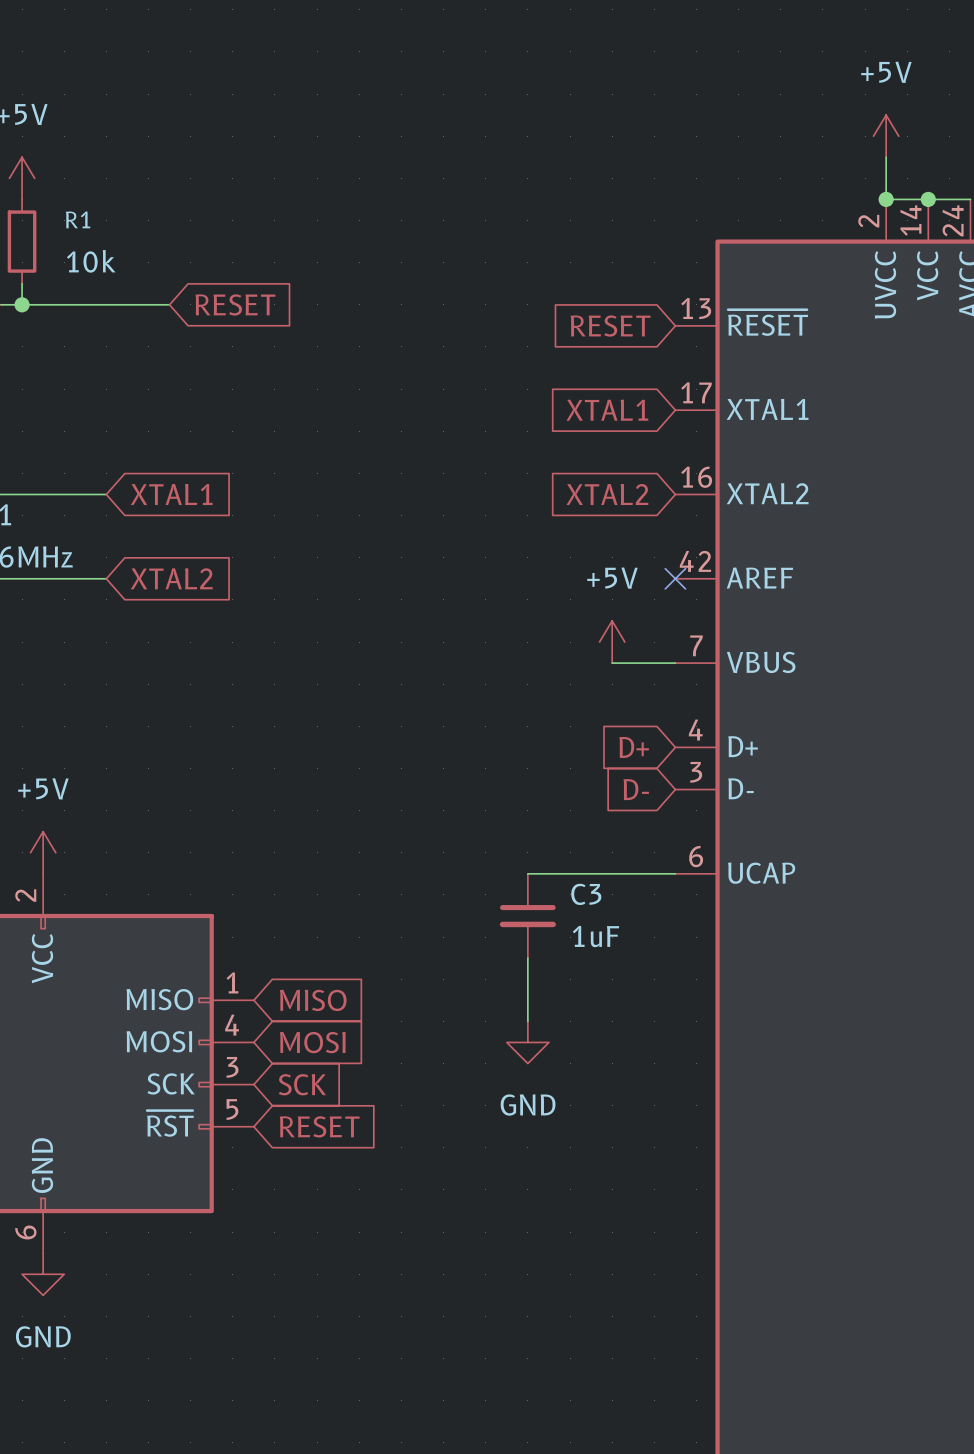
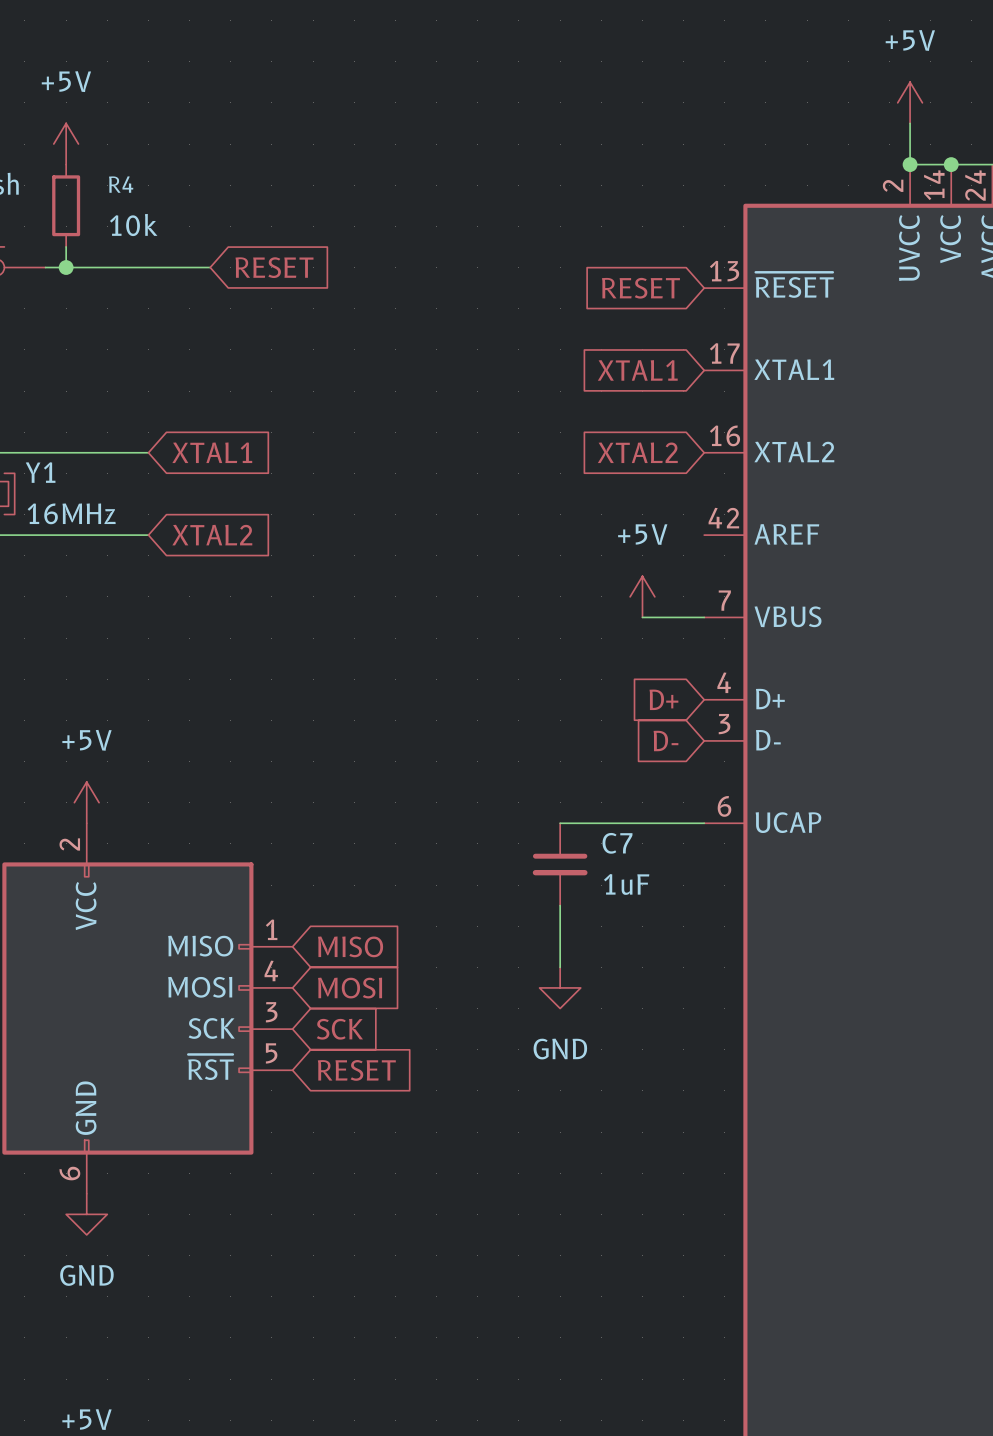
R1 name: R1 (78, 219) -> R4 (121, 184)
no-connect mark: (675, 578) -> none
C3 name: C3 (586, 894) -> C7 (617, 843)

